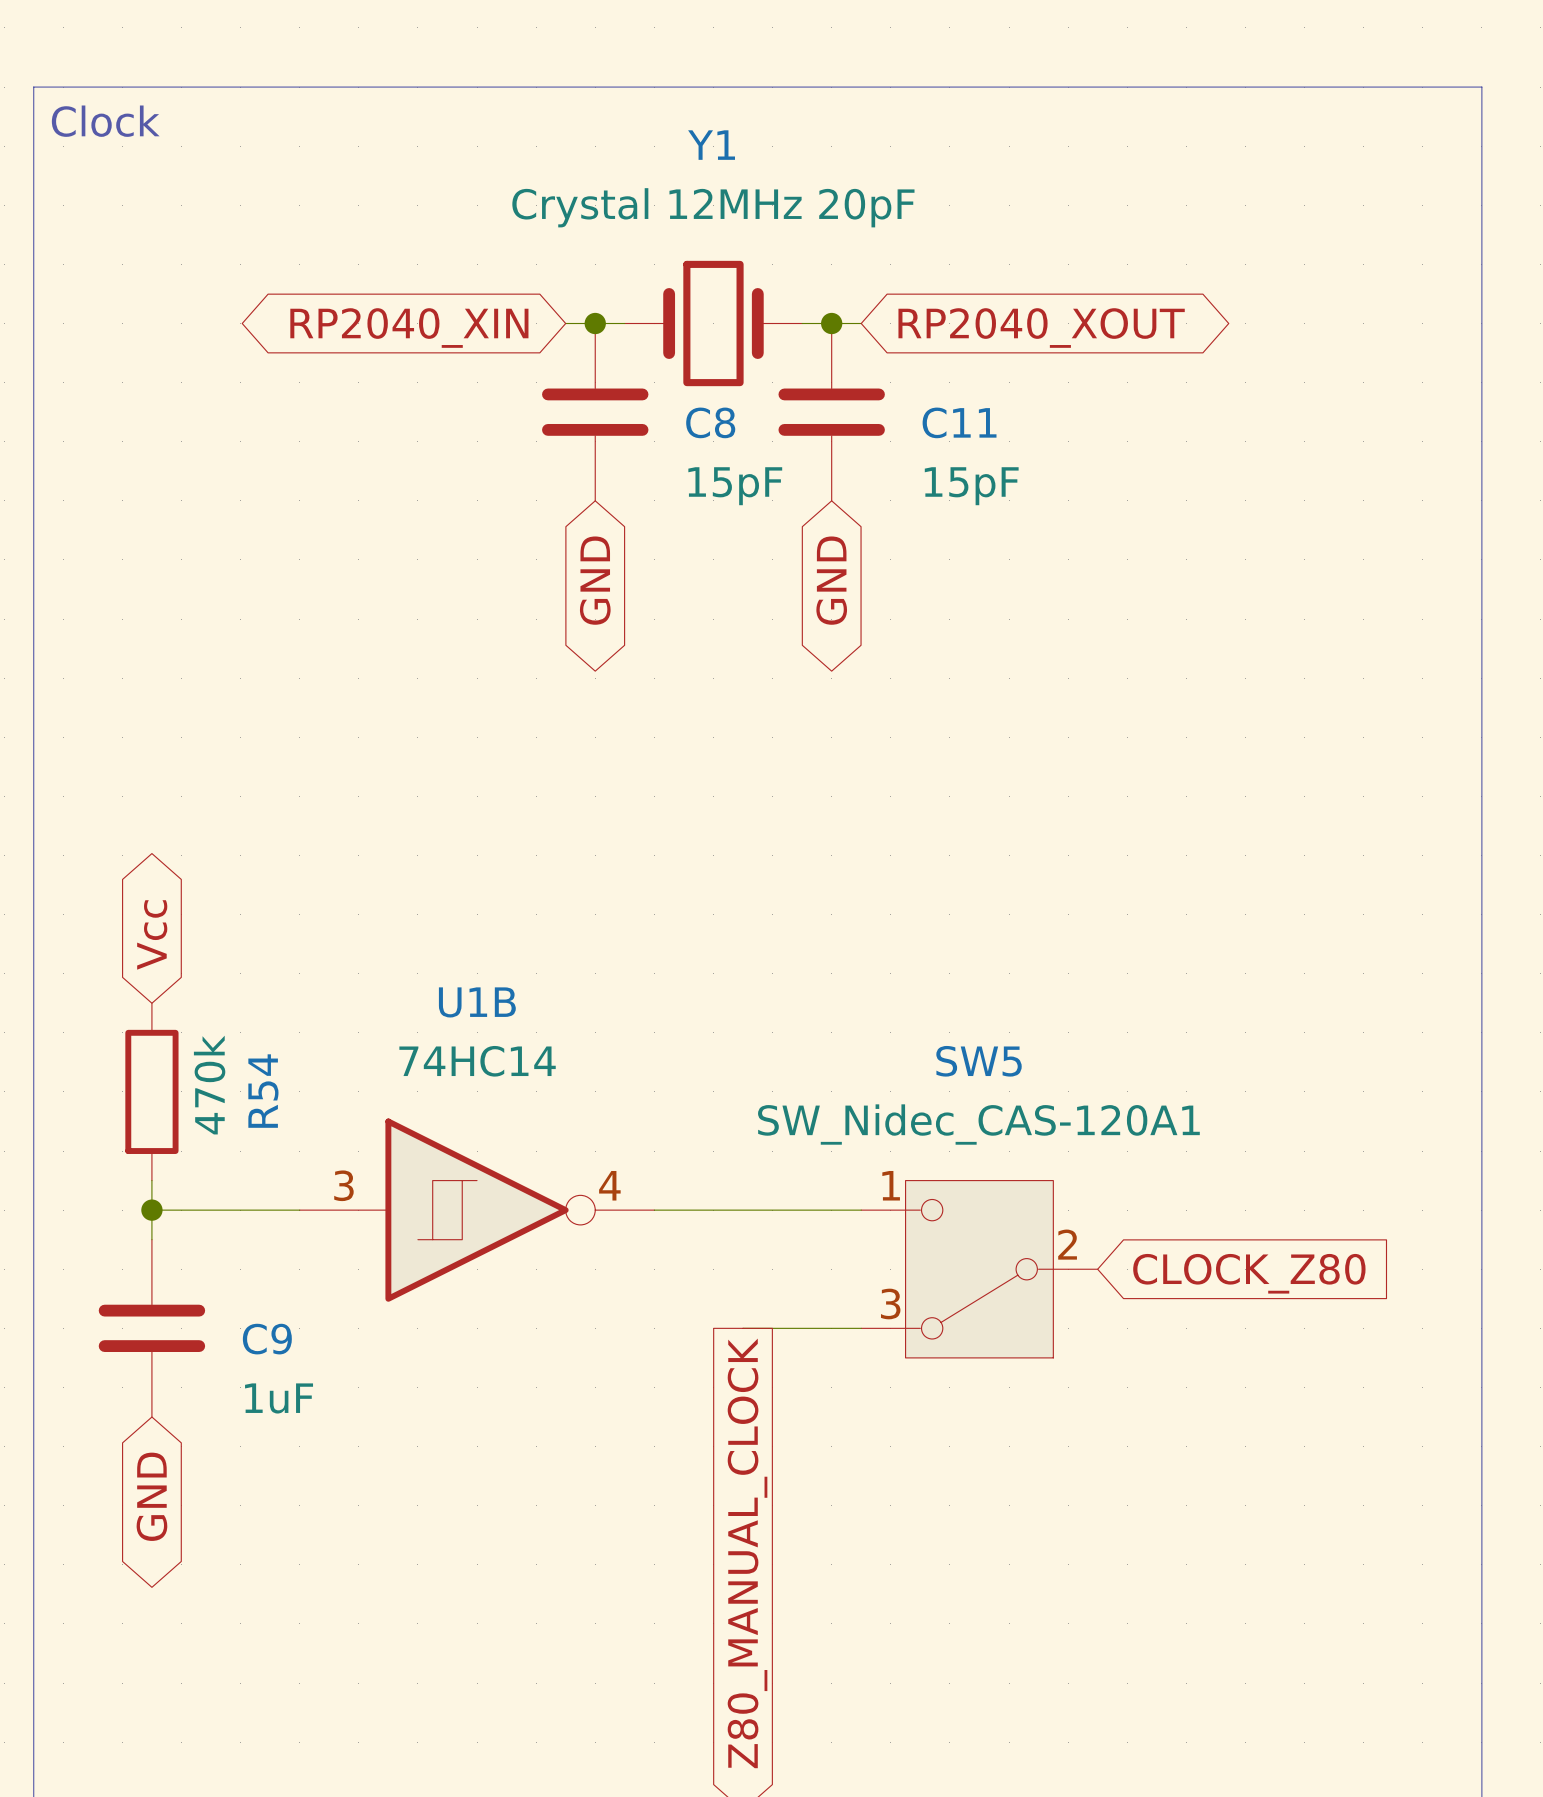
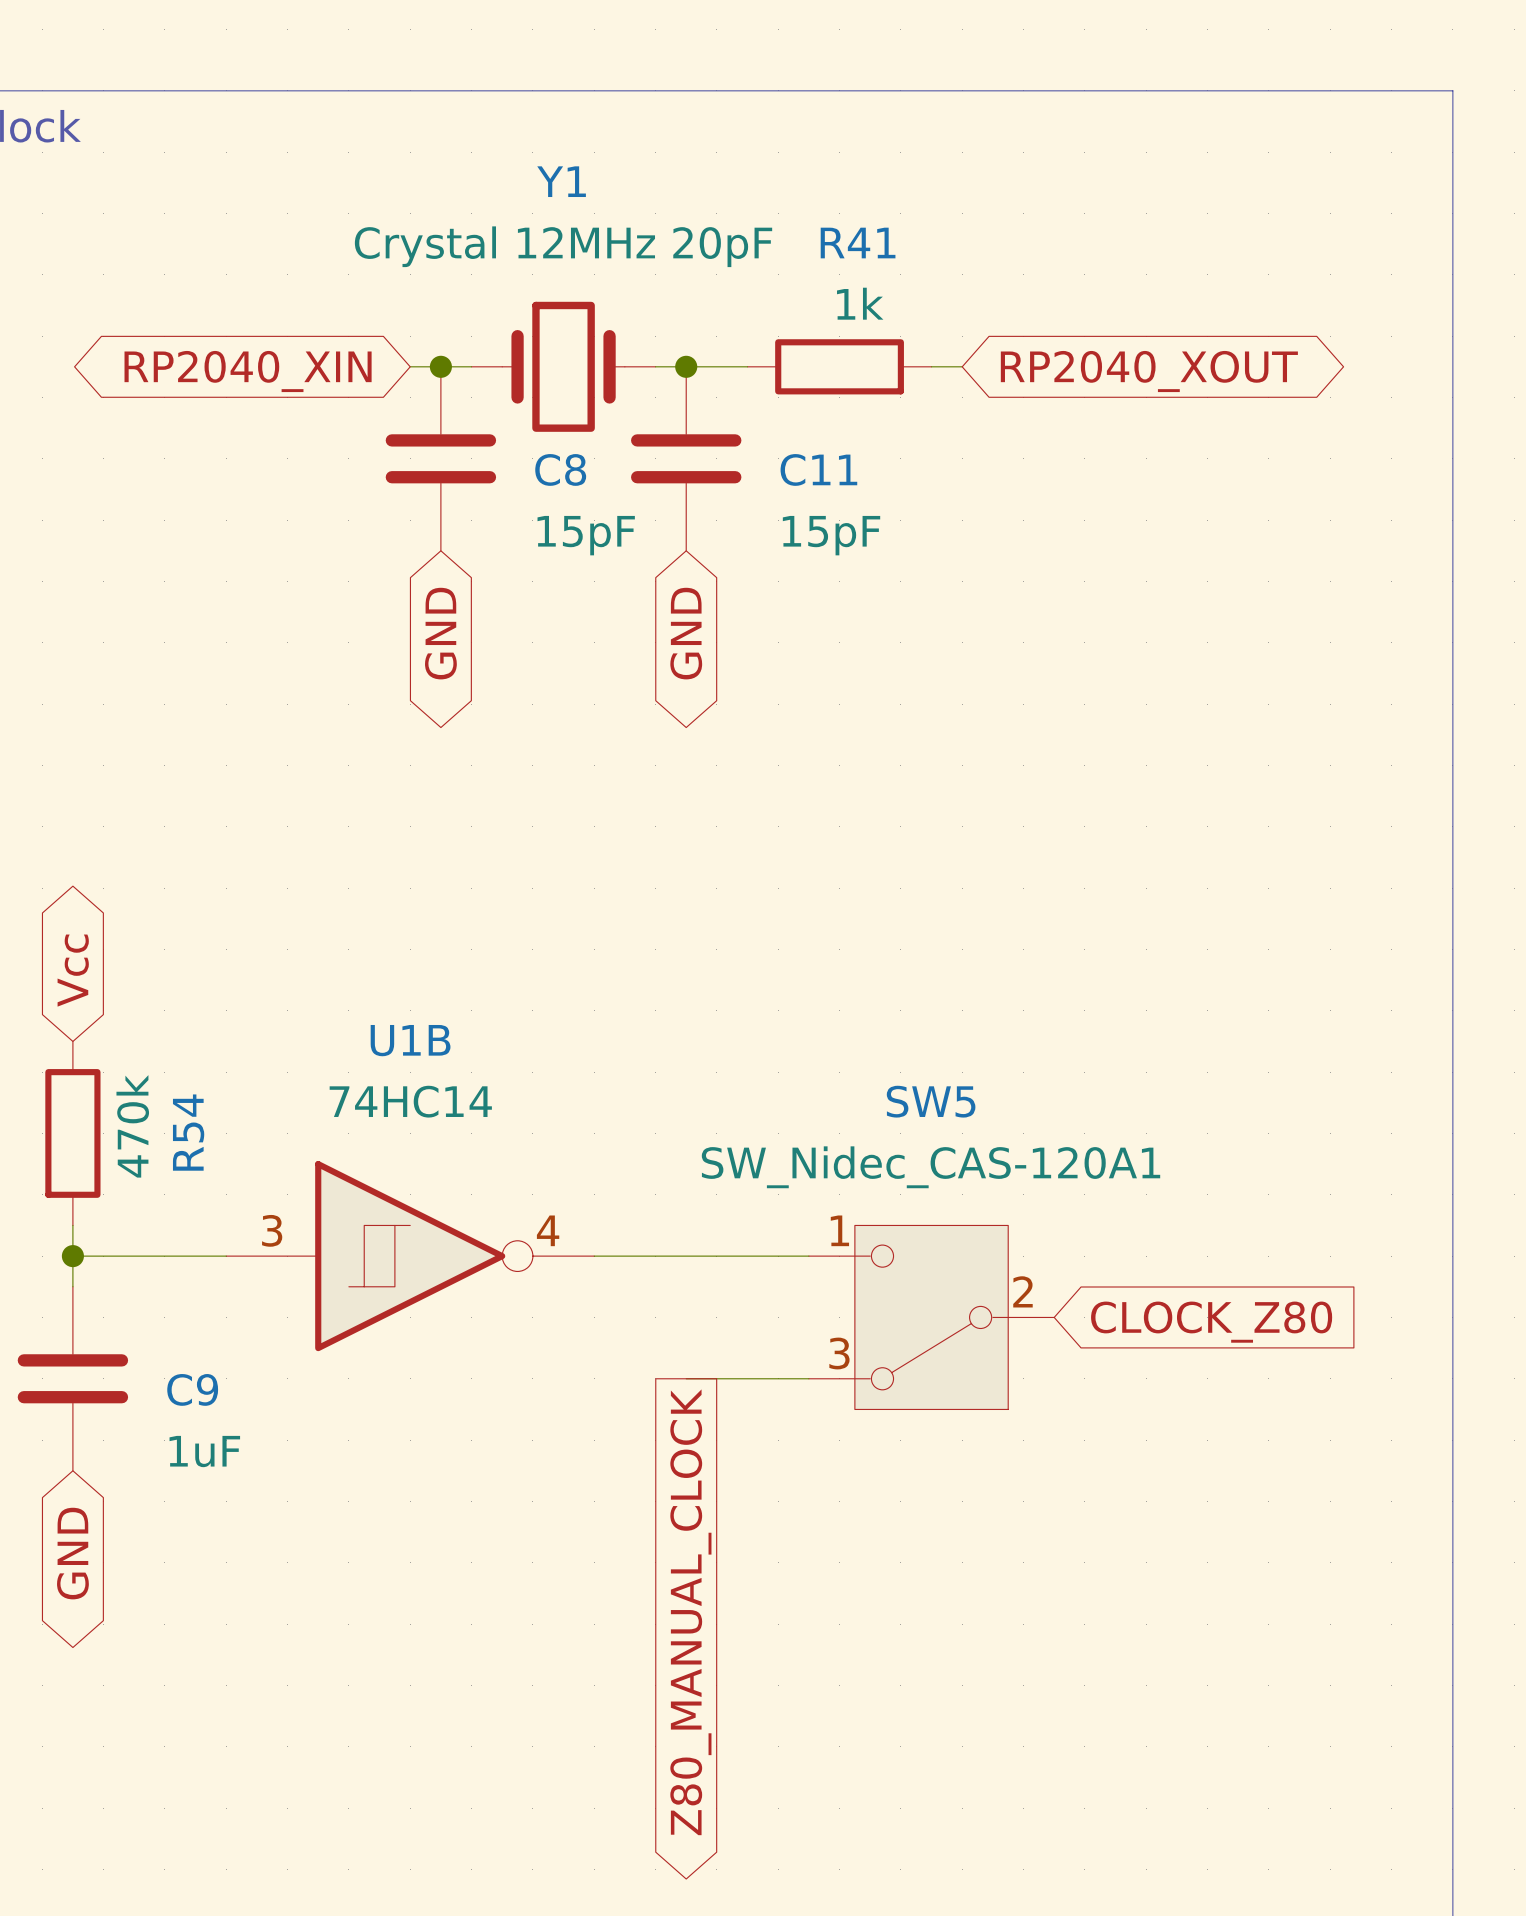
wire: (565, 323) (624, 323) -> (410, 366) (471, 366)
junction: (595, 323) -> none
Y1 position: (713, 323) -> (563, 366)
wire: (802, 323) (861, 323) -> none
junction: (831, 323) -> none
global label position: RP2040_XIN (409, 328) -> RP2040_XIN (248, 371)
global label position: RP2040_XOUT (1041, 328) -> RP2040_XOUT (1149, 371)
junction: none -> (440, 366)
wire: none -> (655, 366) (747, 366)
junction: none -> (686, 366)
R41: none -> 1k (839, 366)
wire: none -> (931, 366) (962, 366)
C8 position: (595, 412) -> (440, 458)
C11 position: (831, 412) -> (686, 458)
global label: GND (595, 580) -> none
global label: GND (831, 580) -> none
global label: none -> GND (440, 633)
global label: none -> GND (686, 633)

